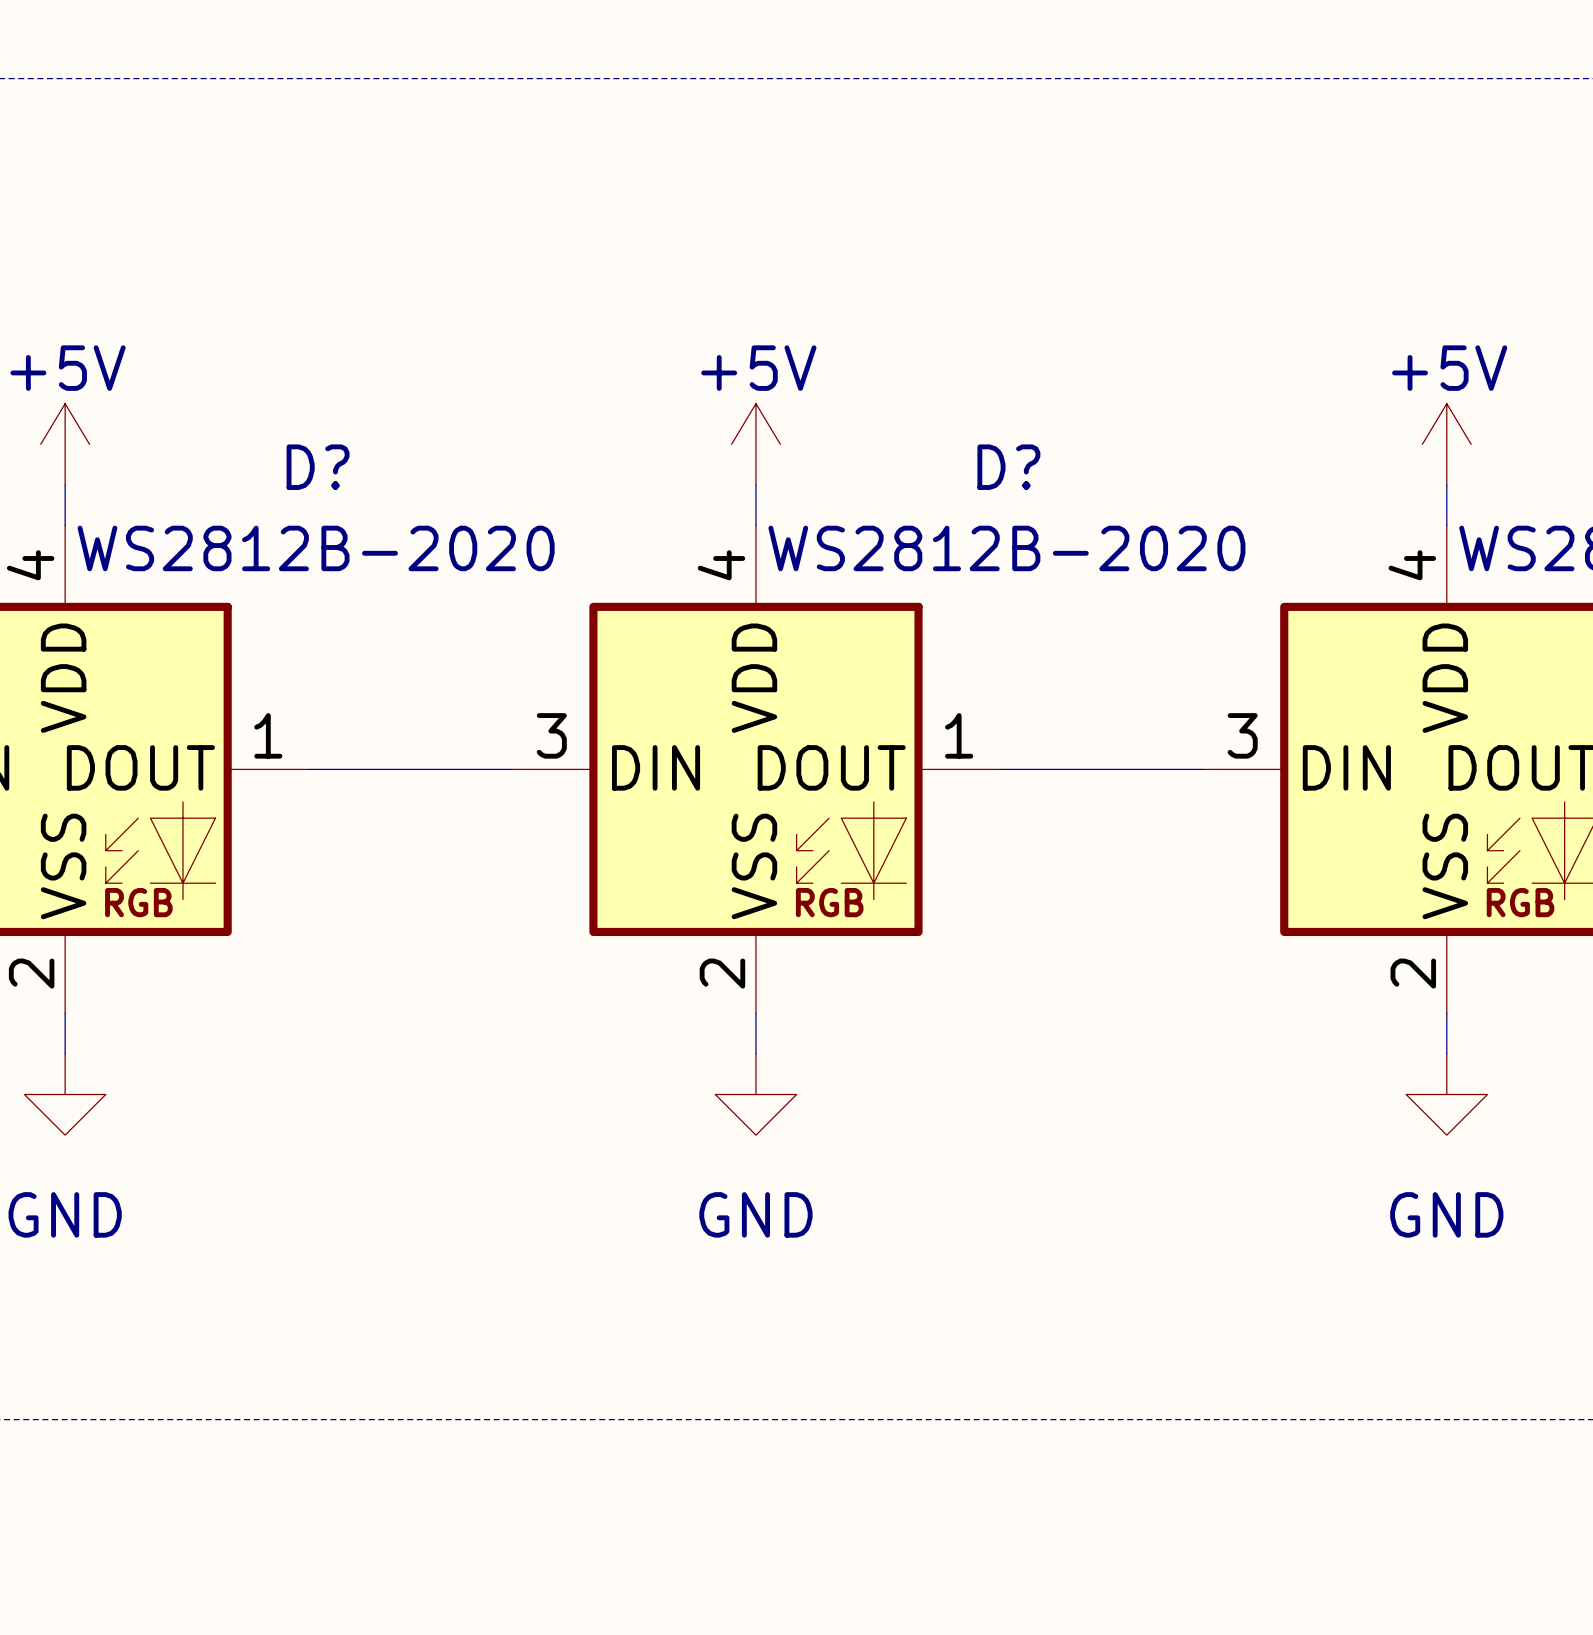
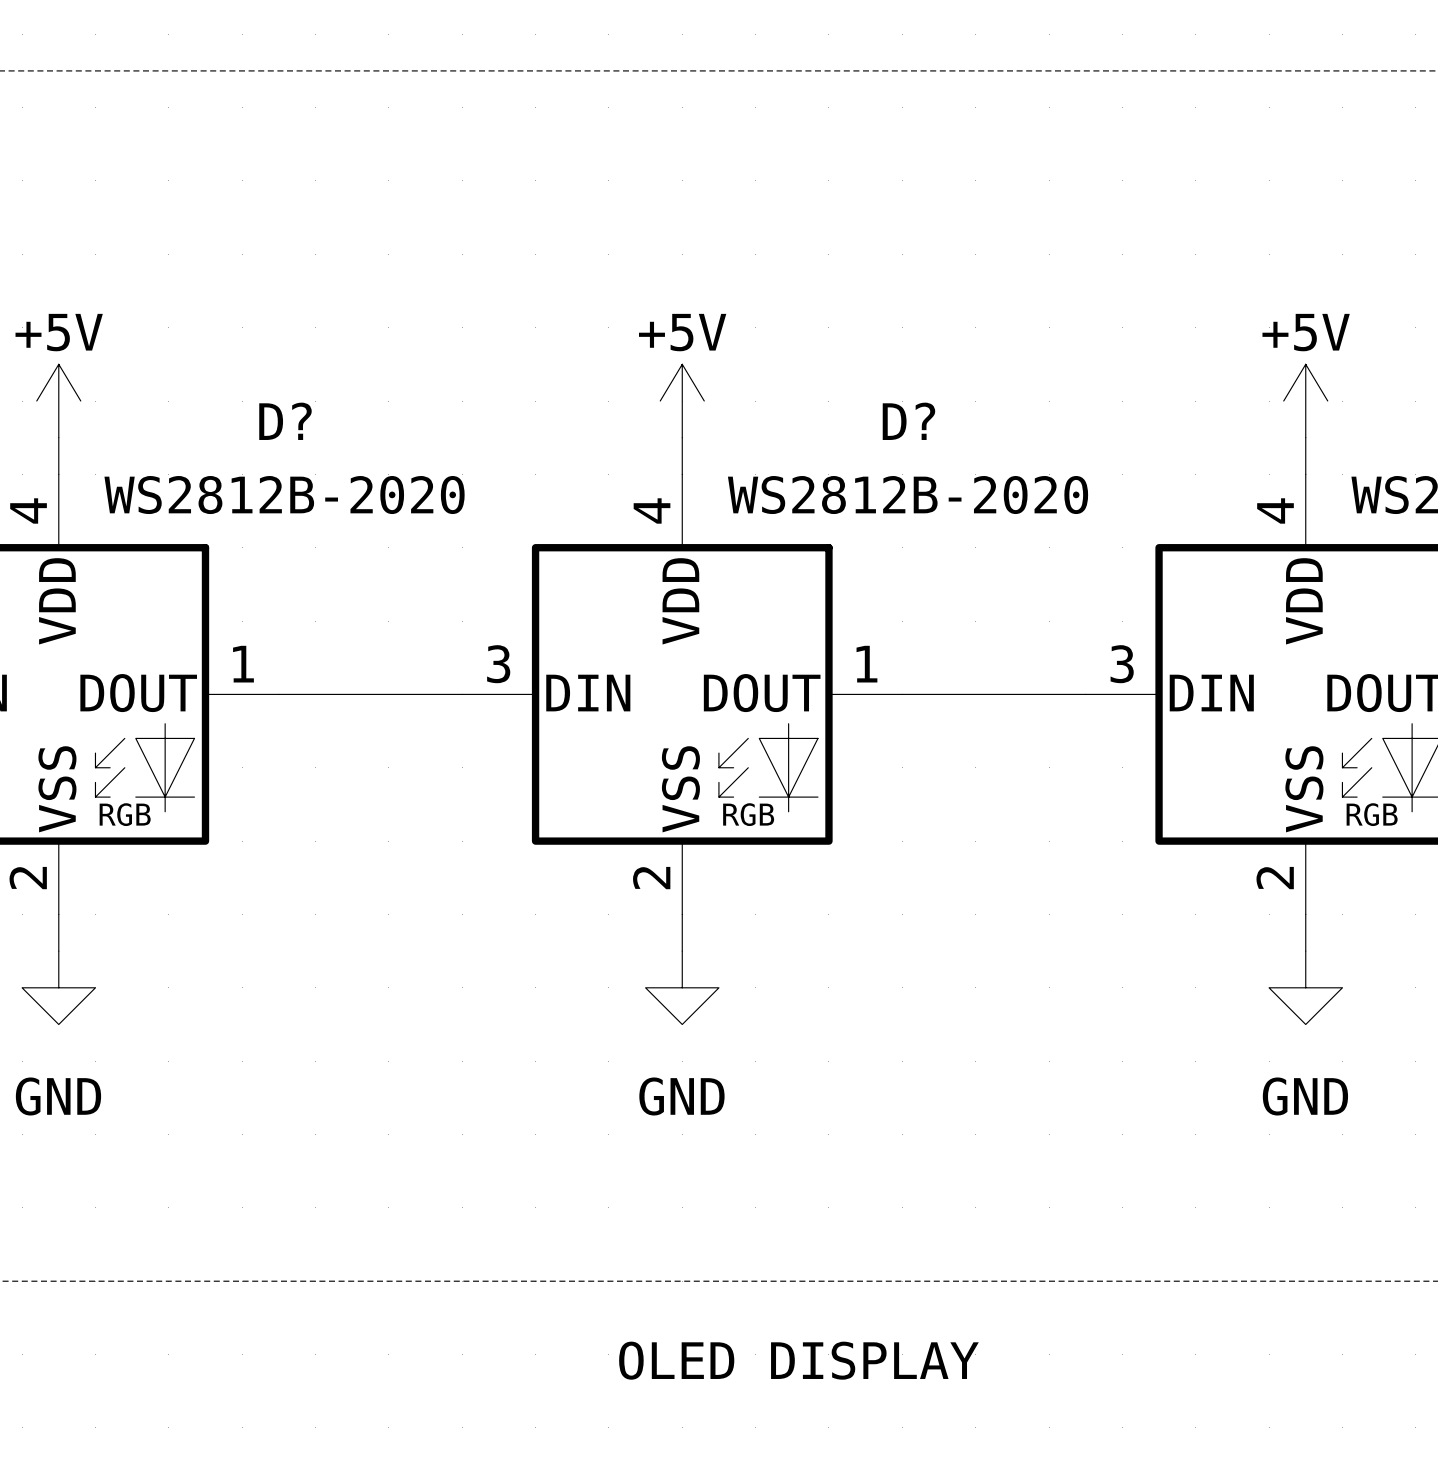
text: none -> OLED DISPLAY (798, 1360)

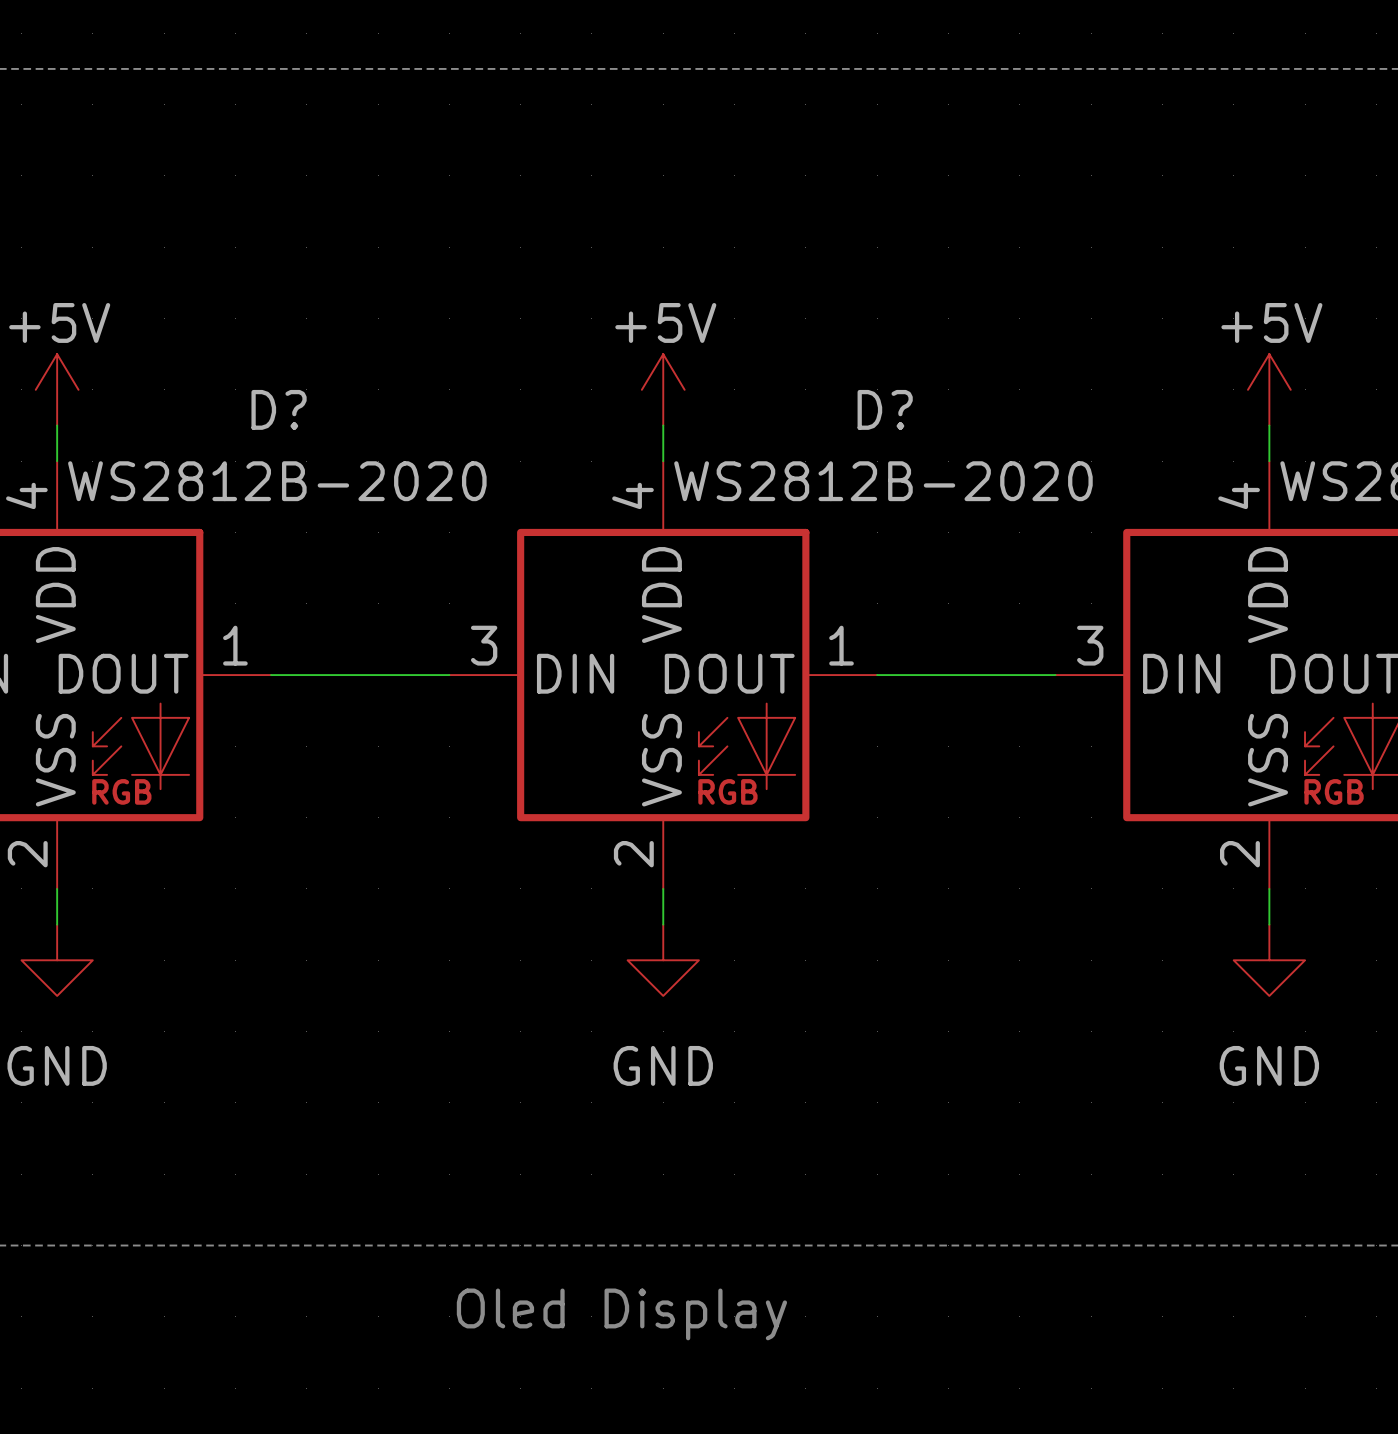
text: none -> Oled Display (621, 1314)
text: OLED DISPLAY (798, 1360) -> none

